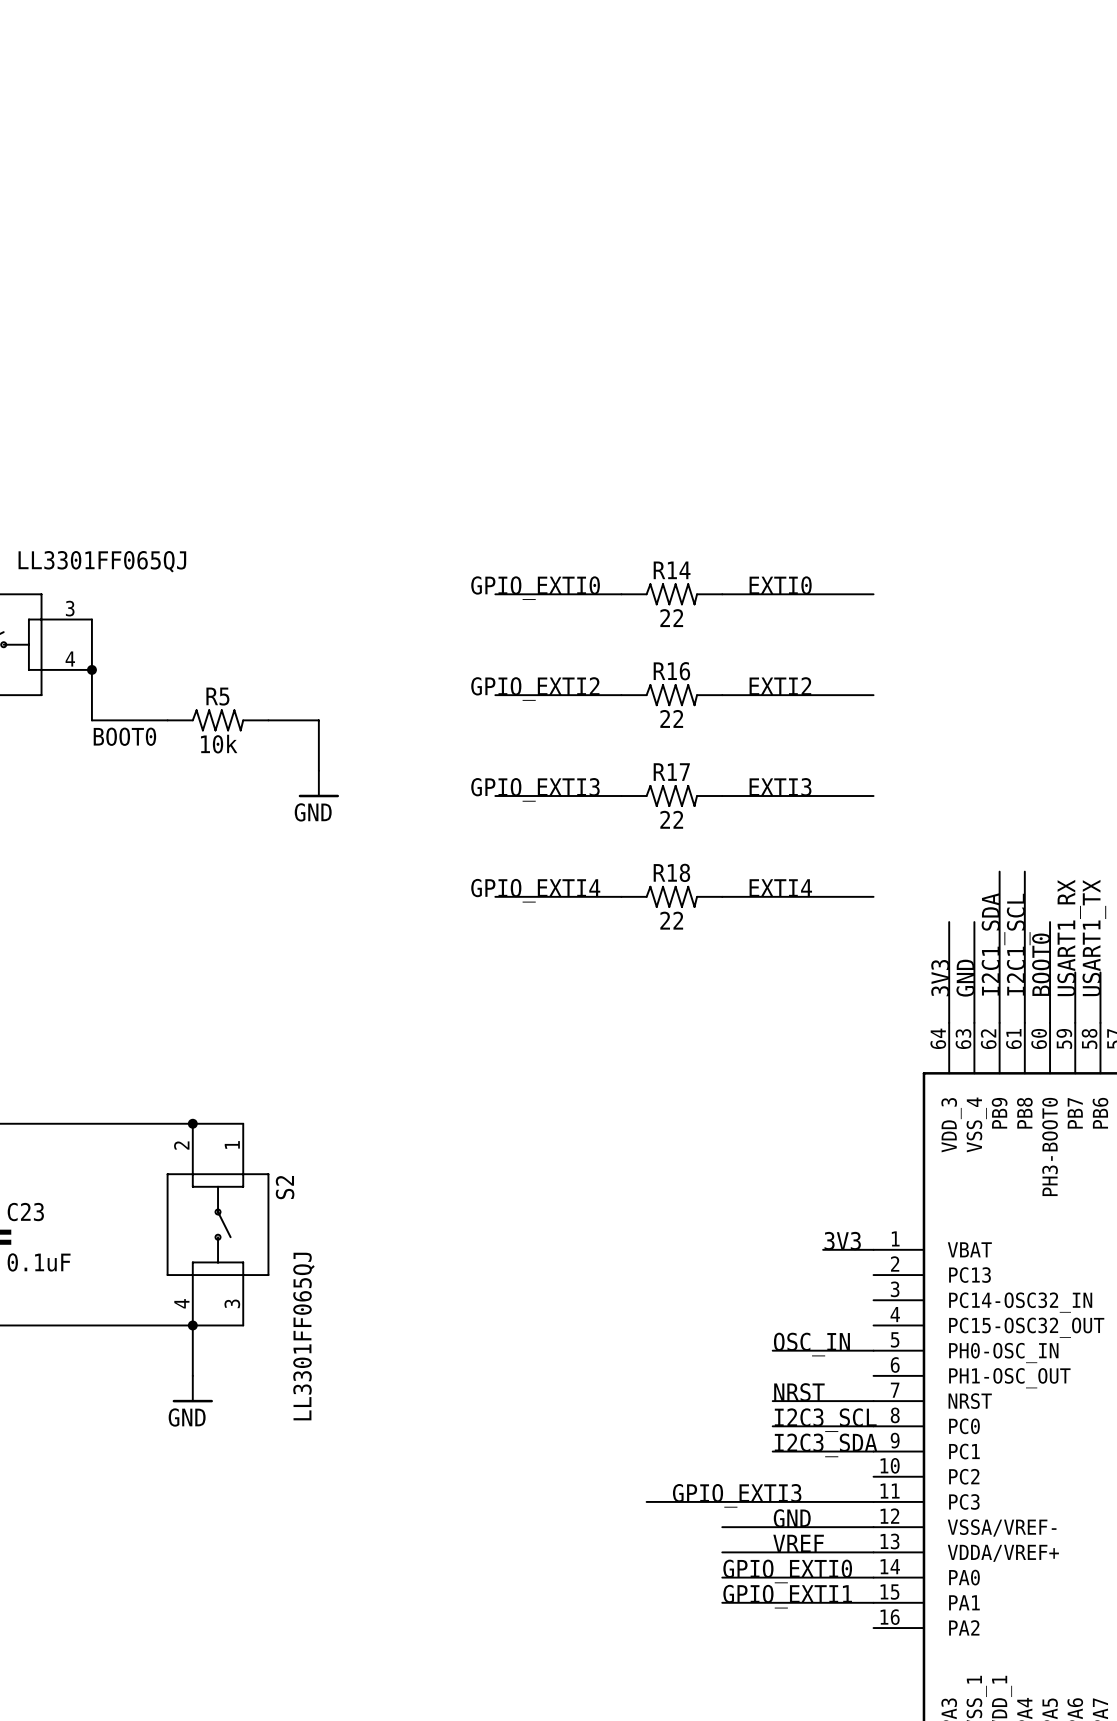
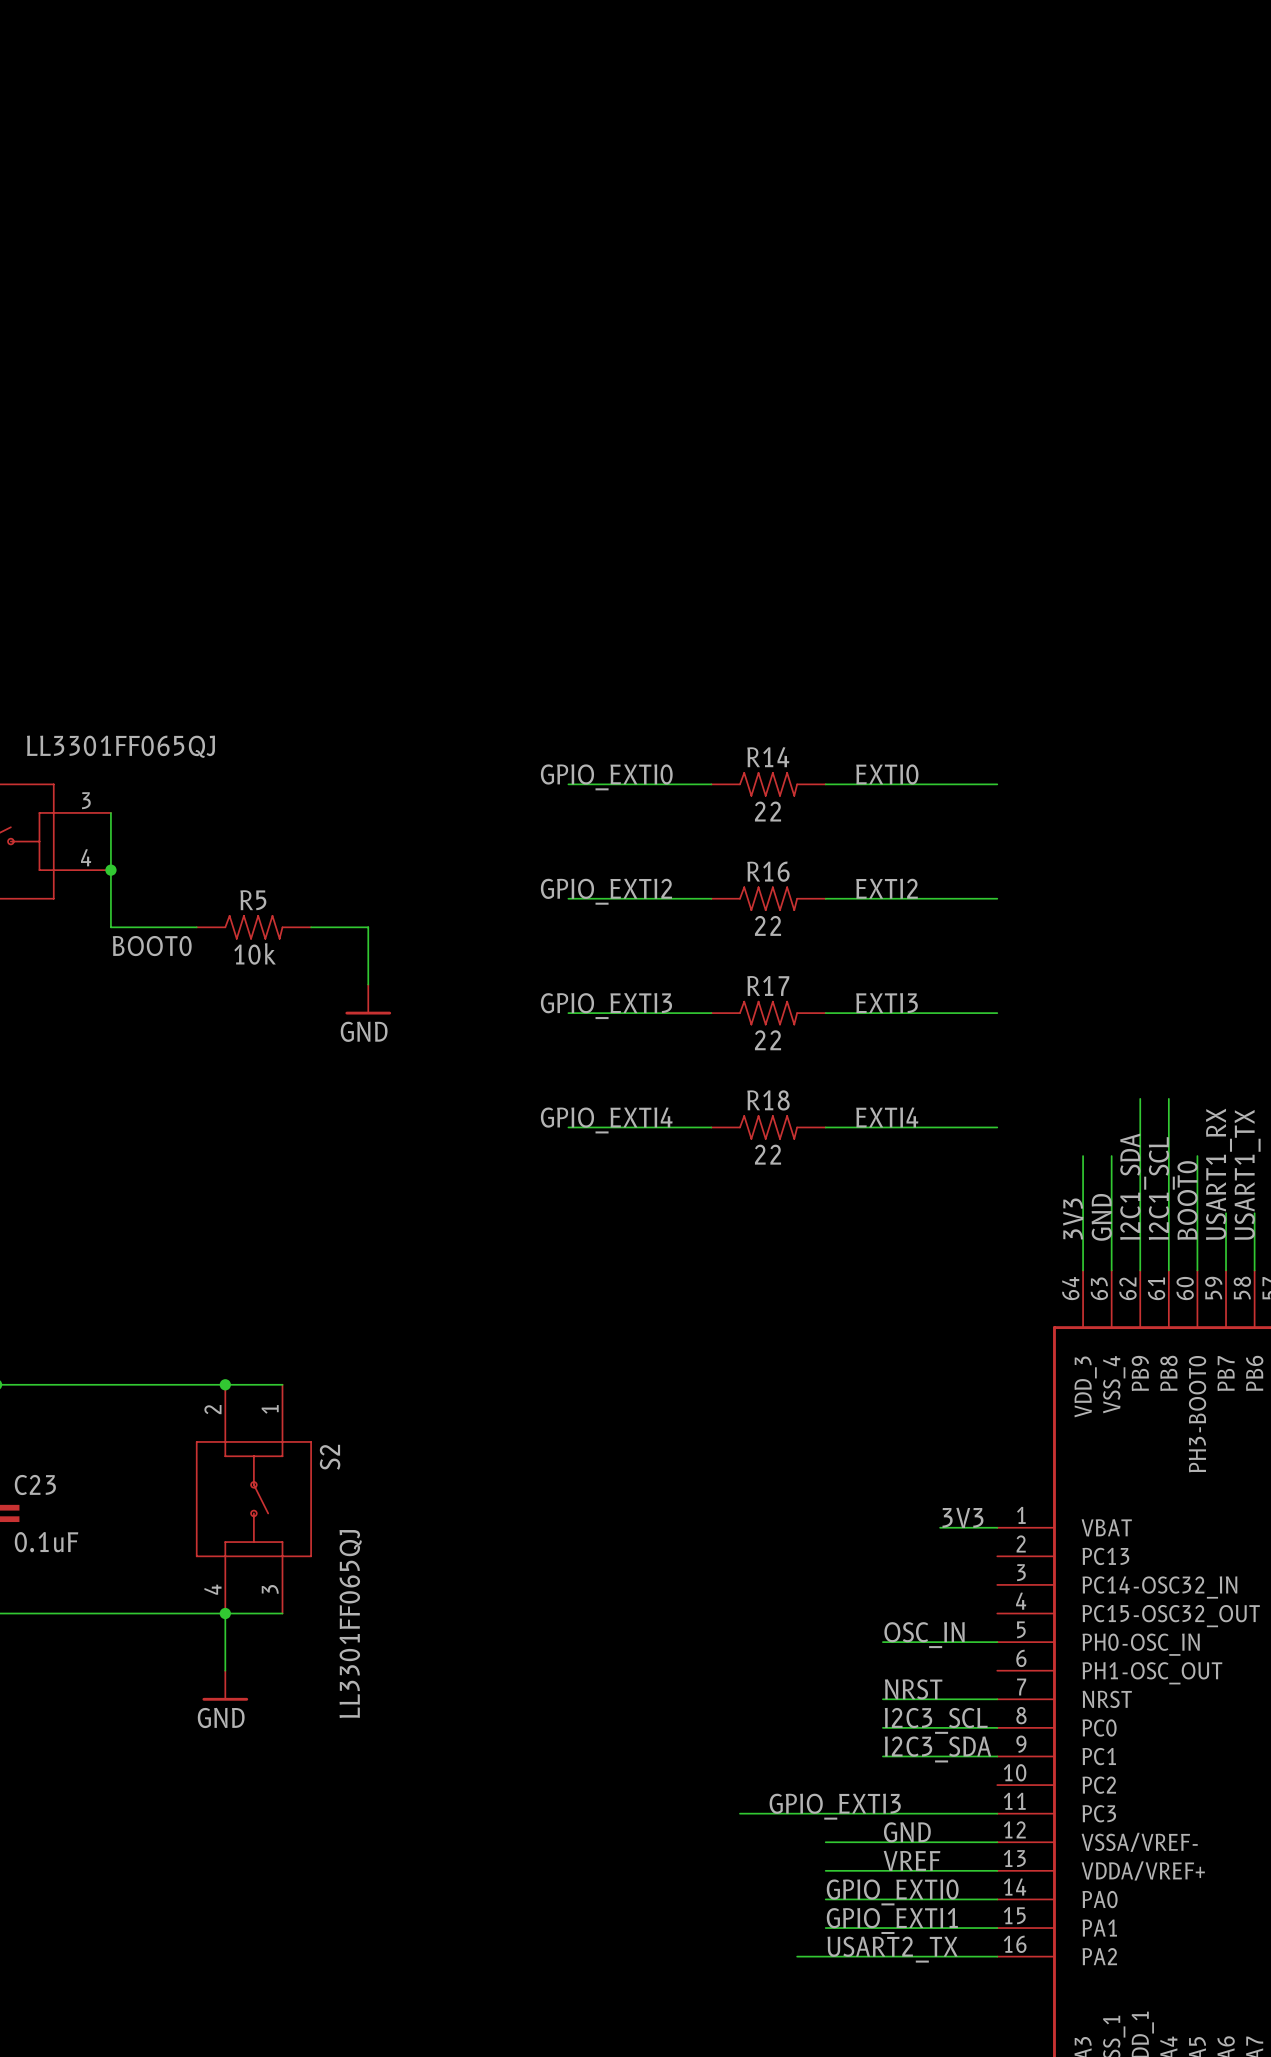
label: none -> USART2_TX (892, 1949)
wire: none -> (797, 1956) (997, 1956)

